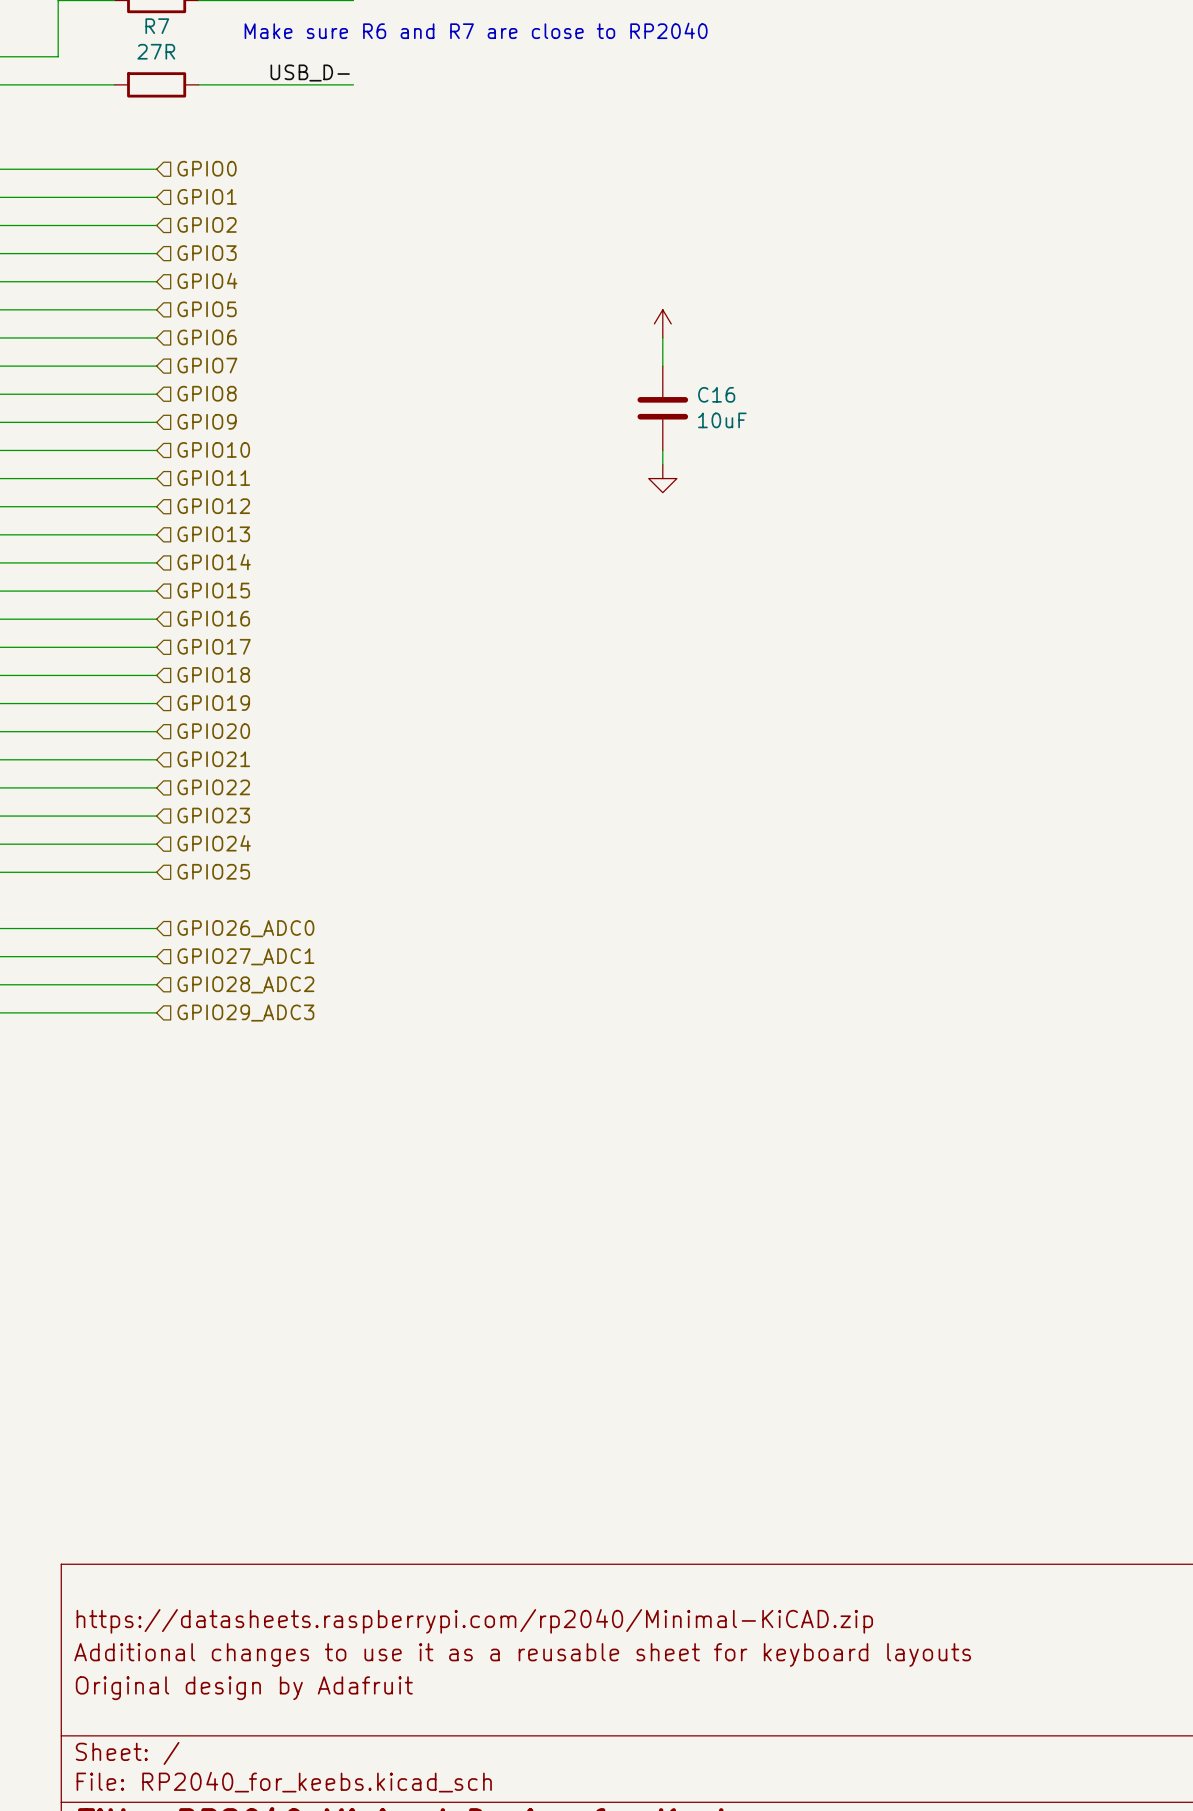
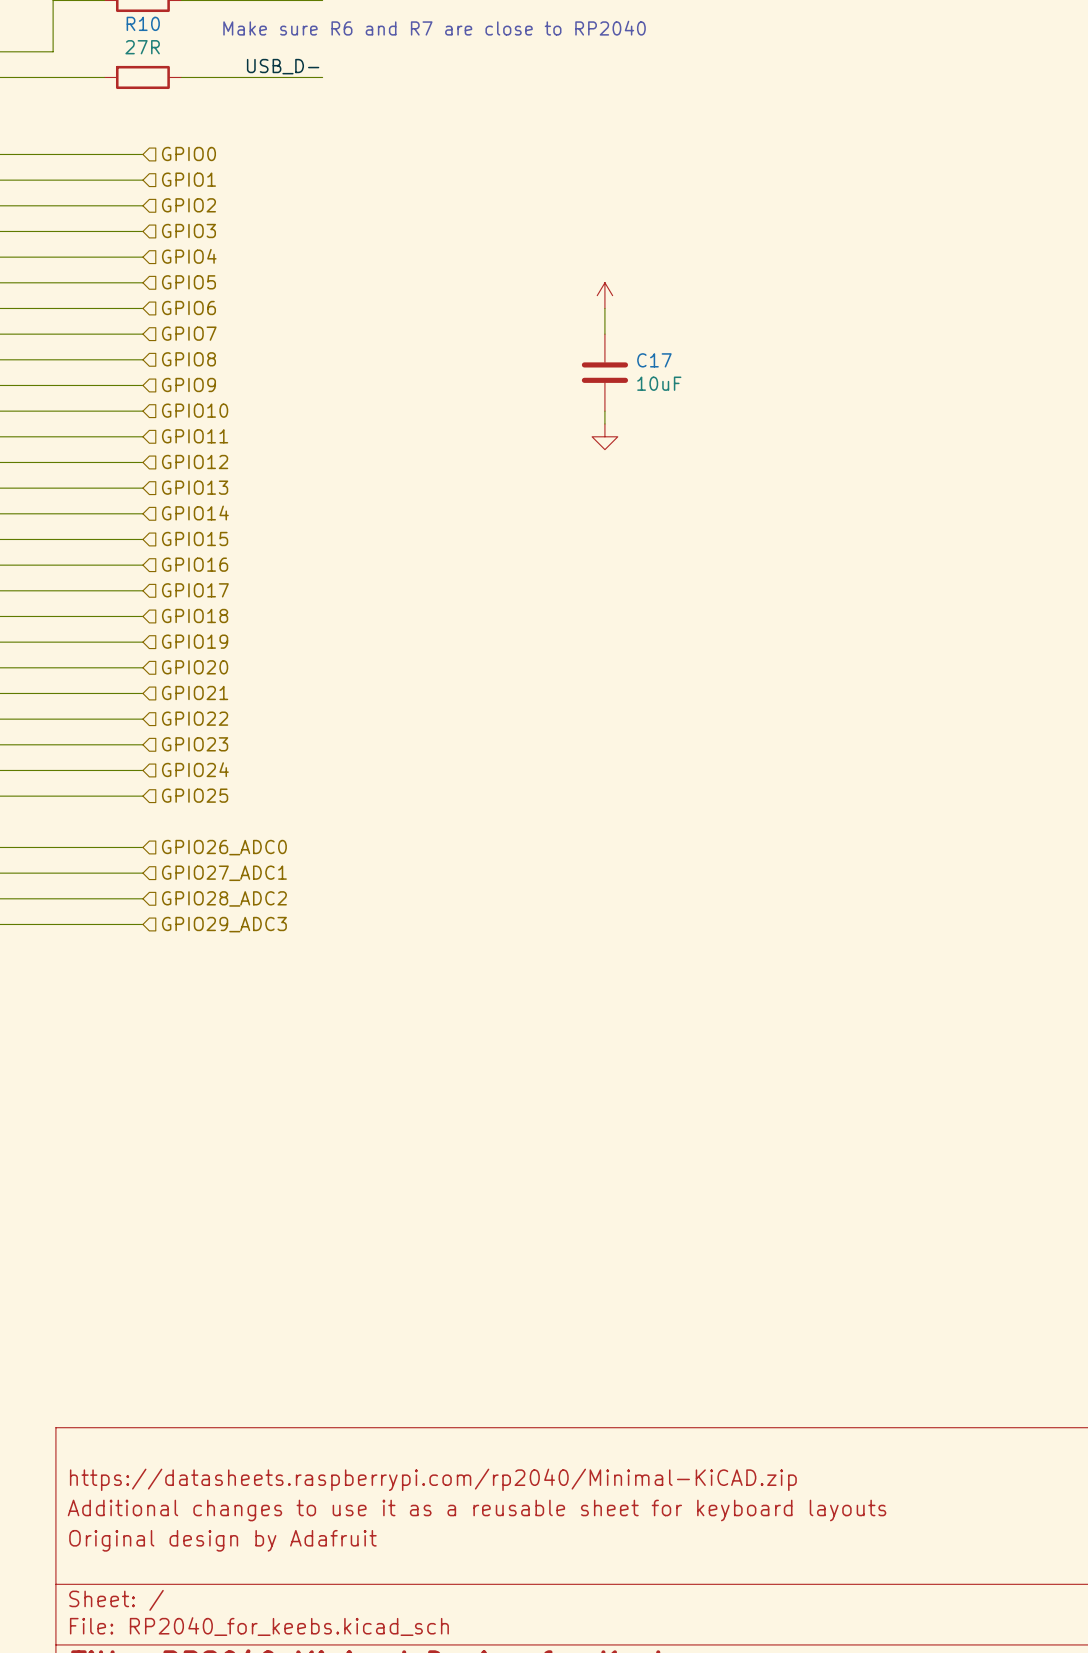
R7 name: R7 (157, 26) -> R10 (143, 23)
C16 name: C16 (716, 394) -> C17 (654, 360)

